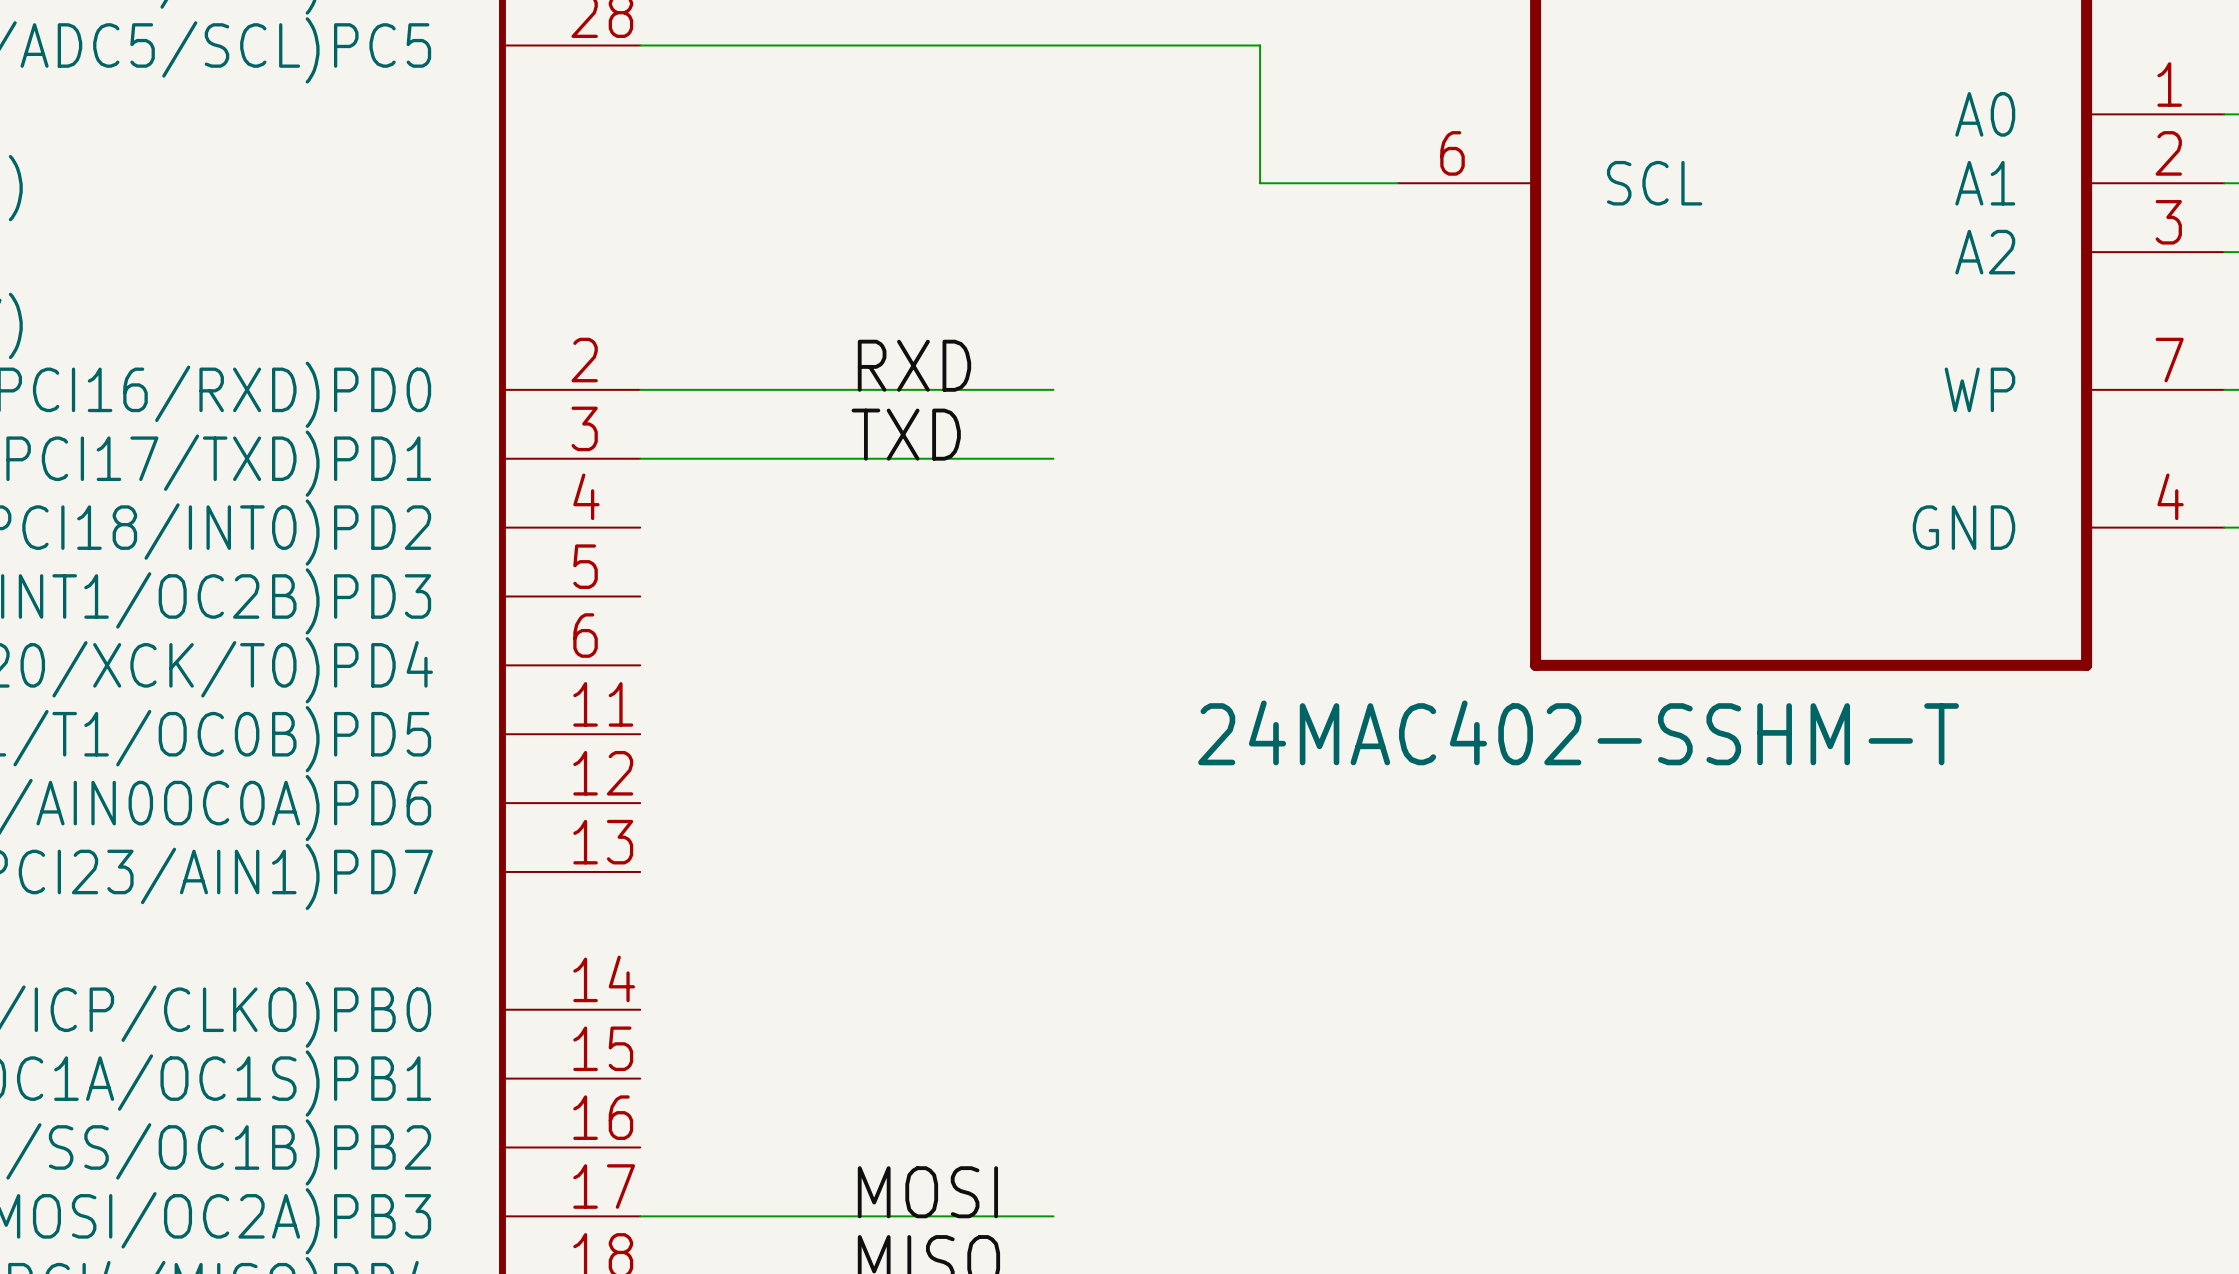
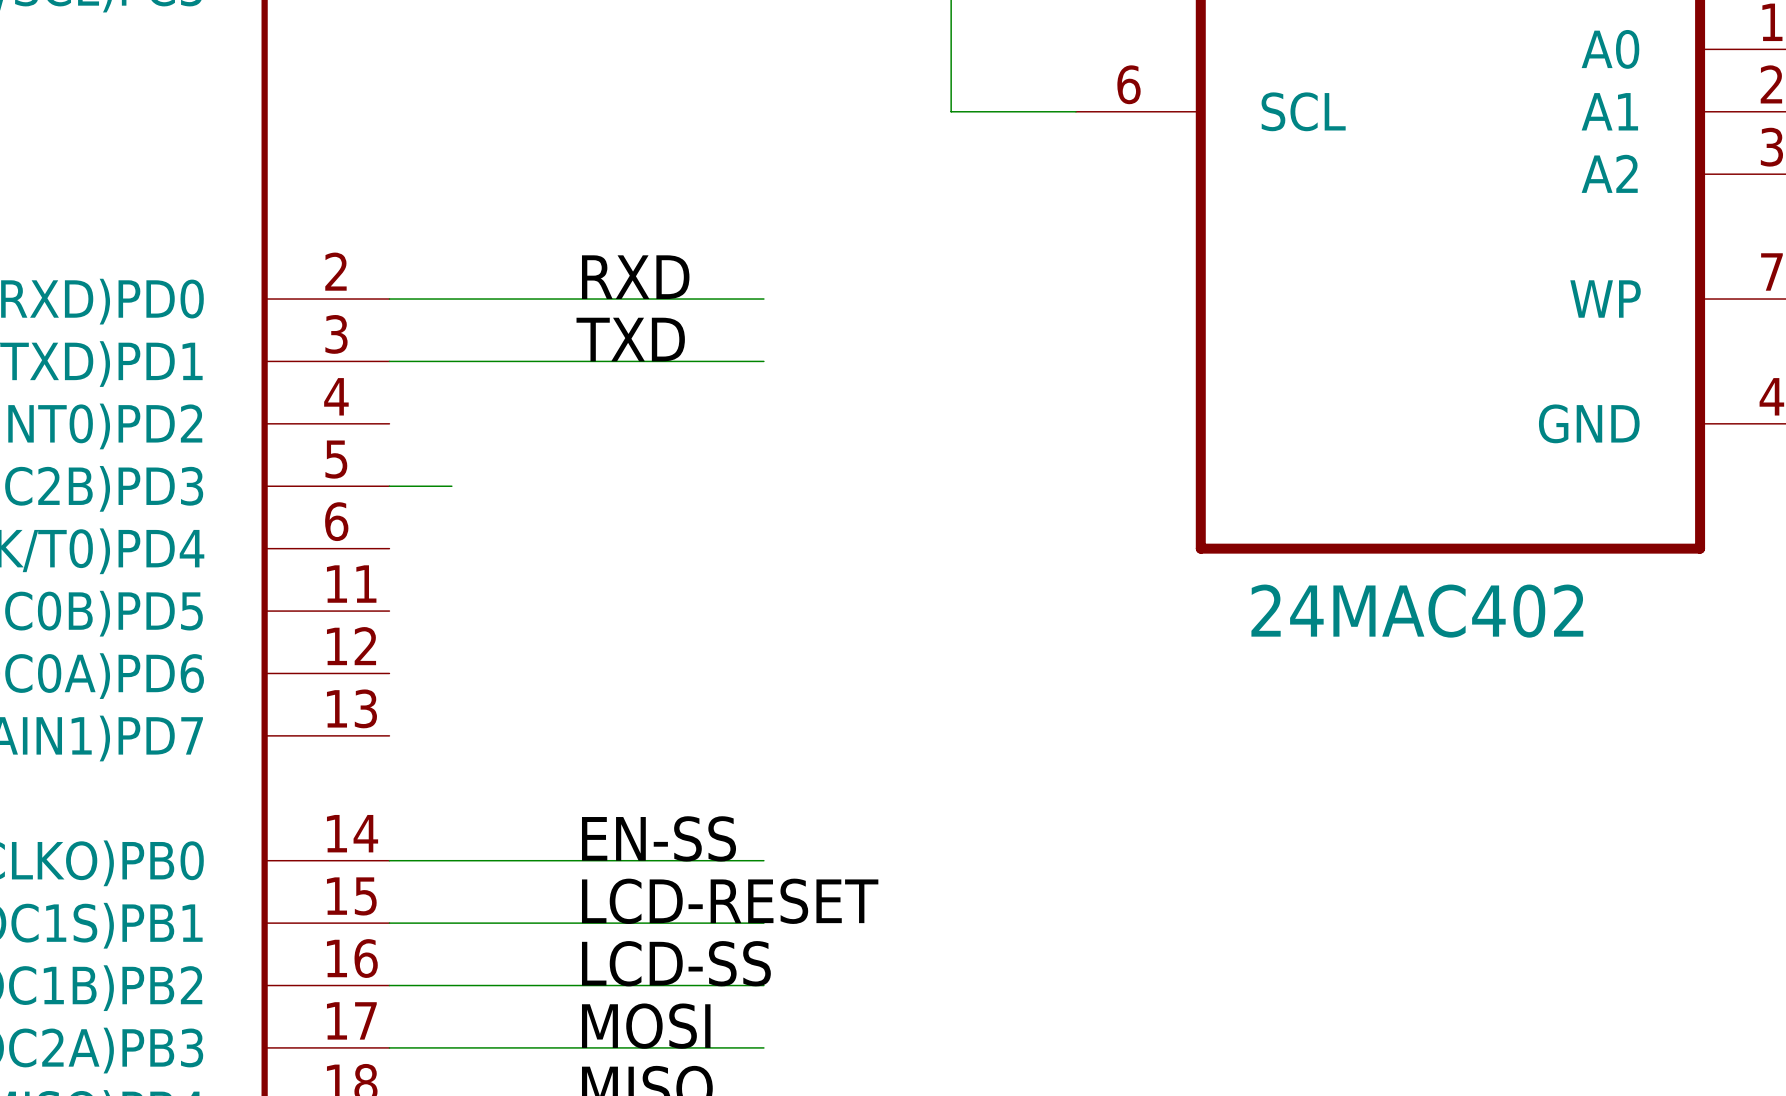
wire: none -> (389, 486) (451, 486)
part value: 24MAC402-SSHM-T (1578, 732) -> 24MAC402 (1417, 611)
label: none -> EN-SS (659, 838)
wire: none -> (389, 860) (763, 860)
label: none -> LCD-RESET (730, 901)
wire: none -> (389, 923) (763, 923)
label: none -> LCD-SS (676, 963)
wire: none -> (389, 985) (763, 985)

